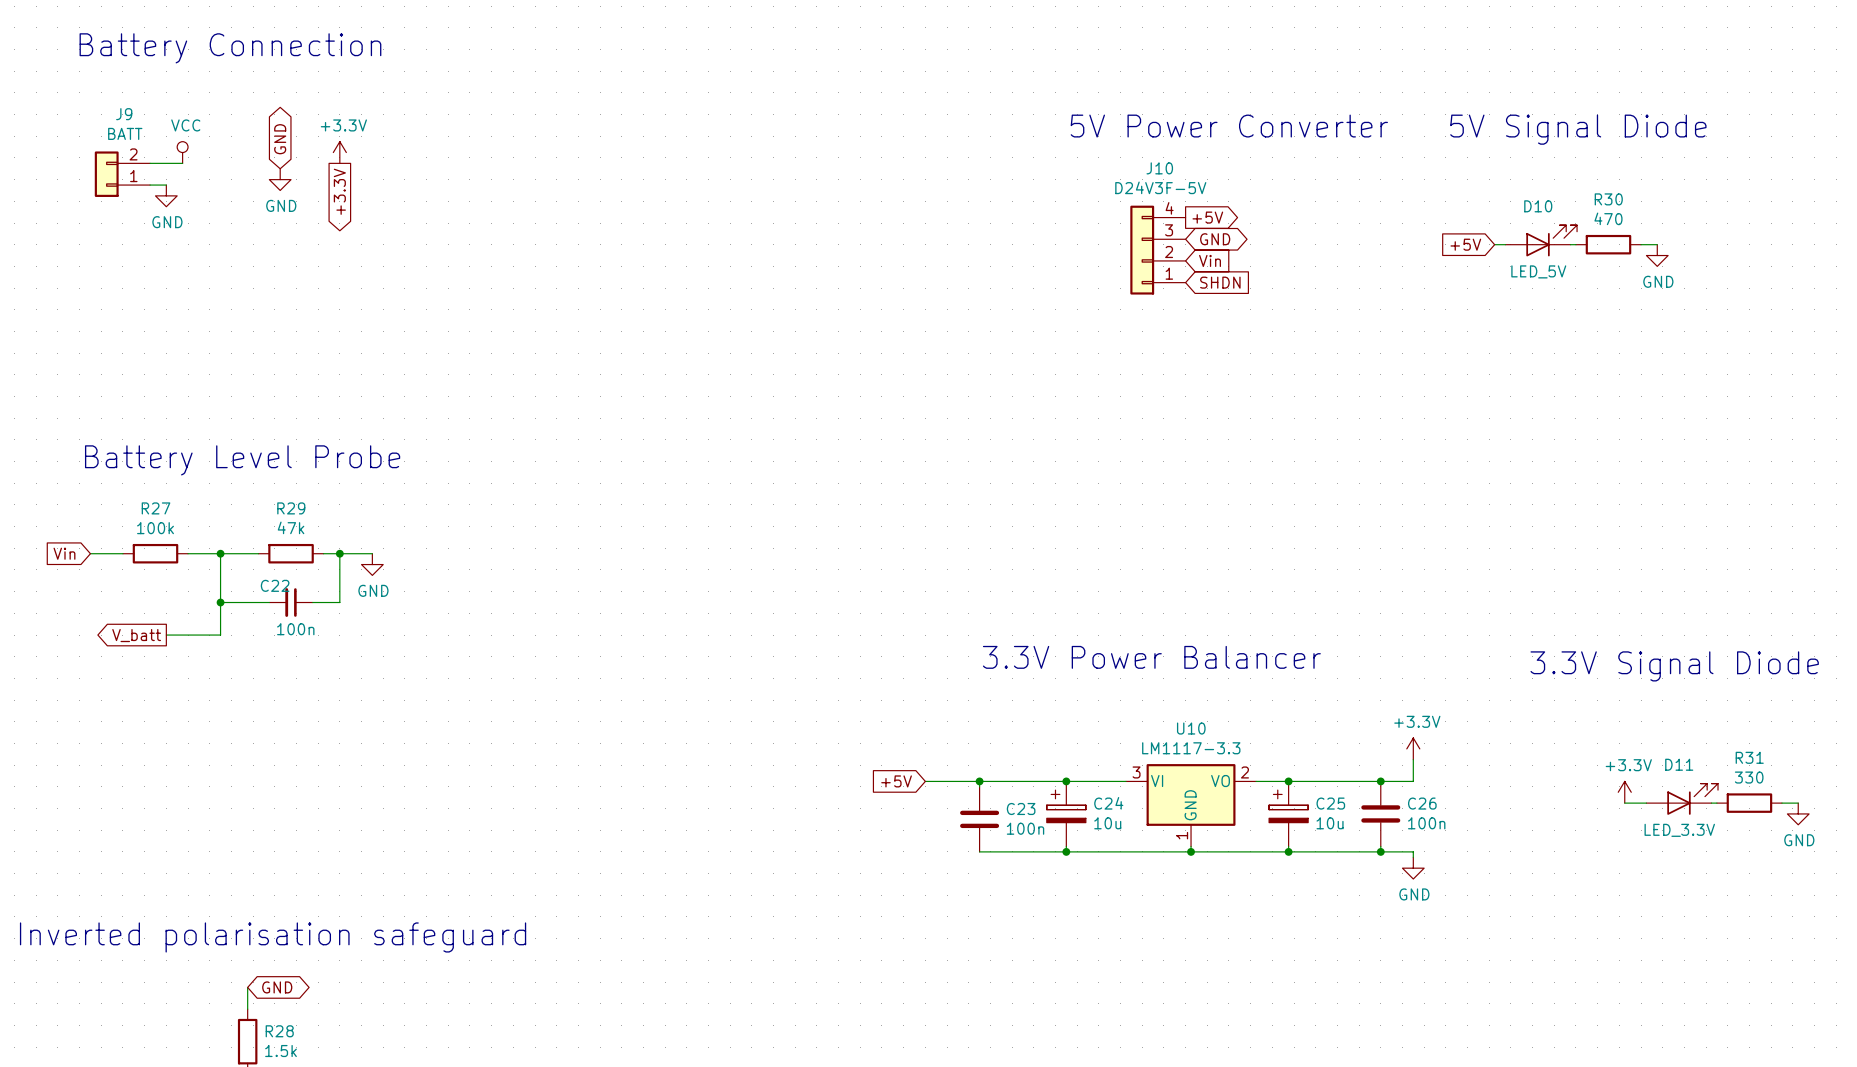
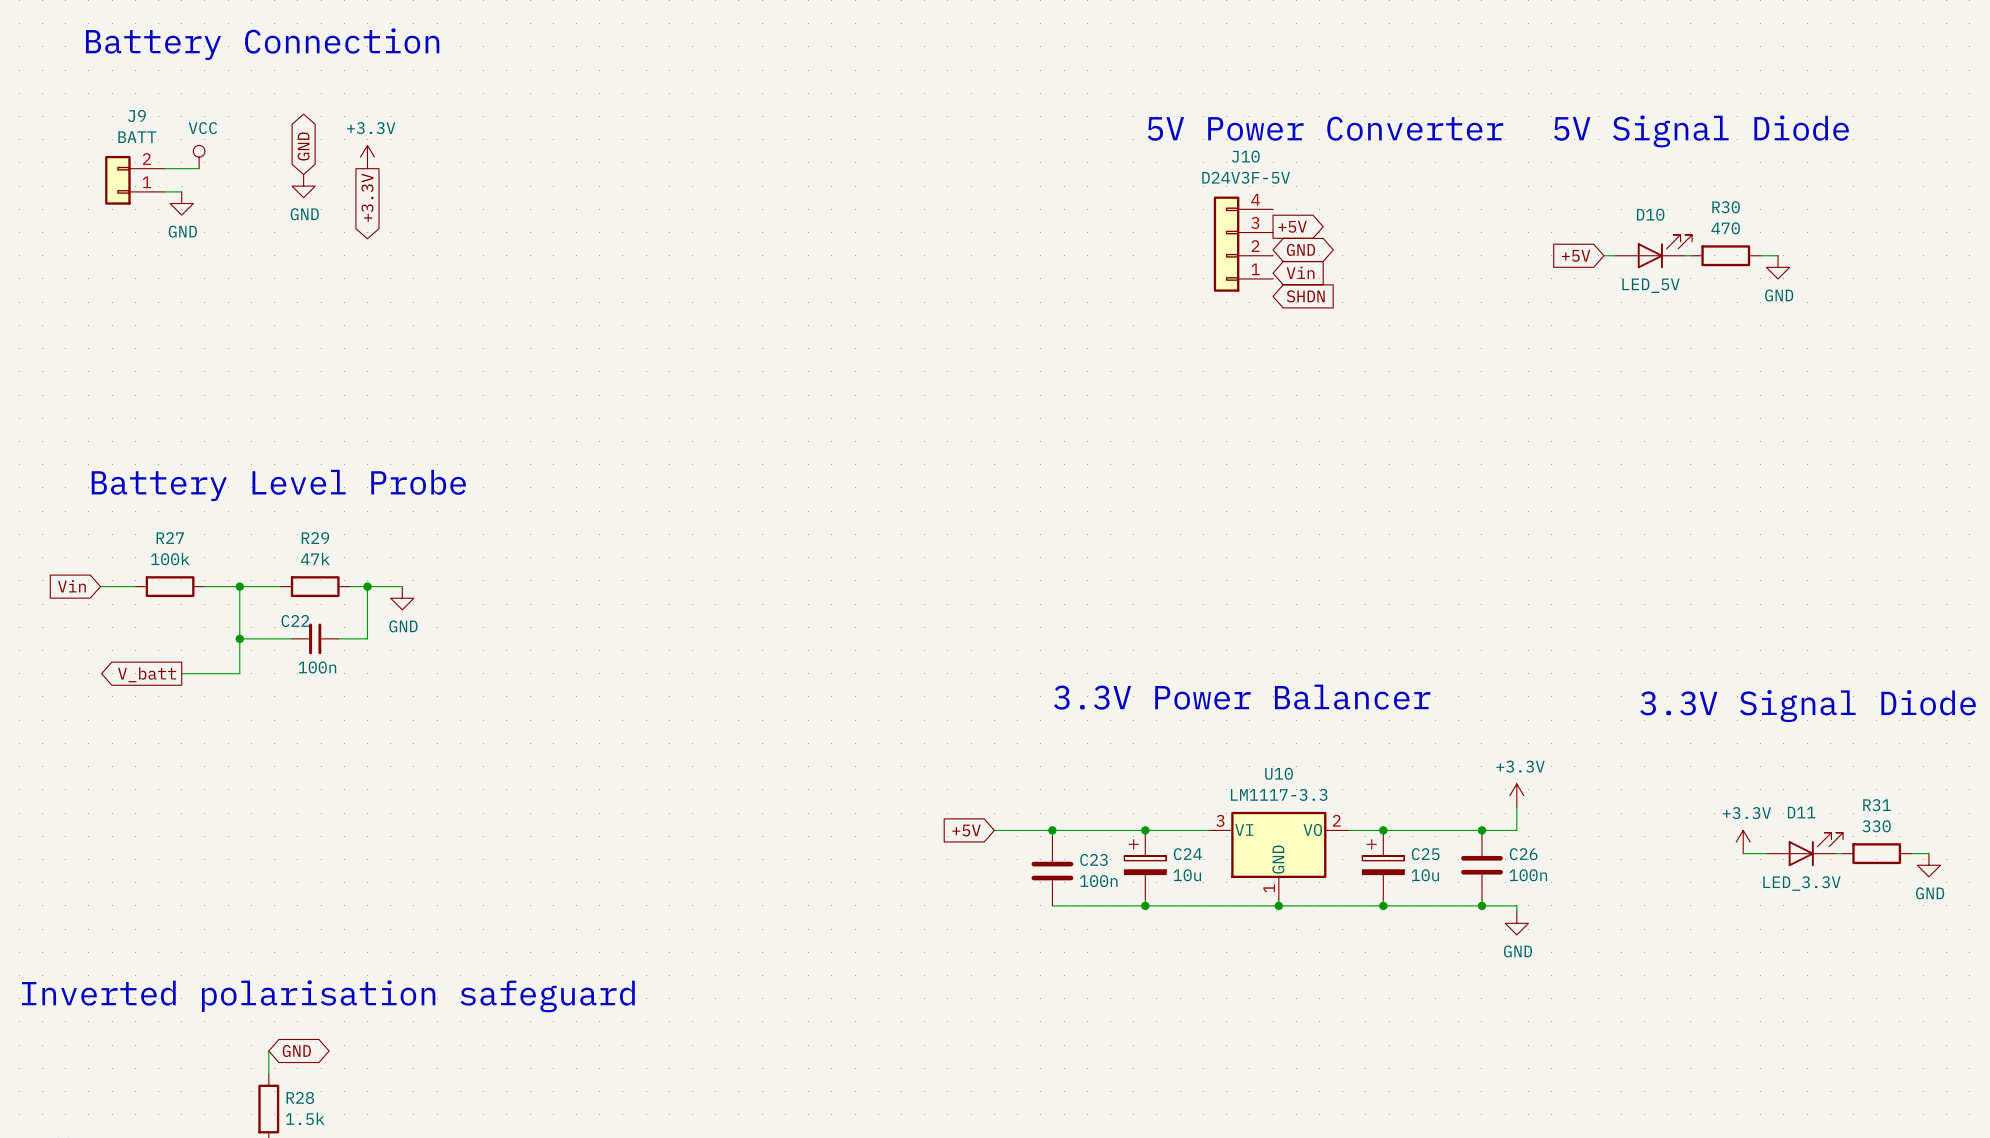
J10 position: (1157, 250) -> (1243, 244)

